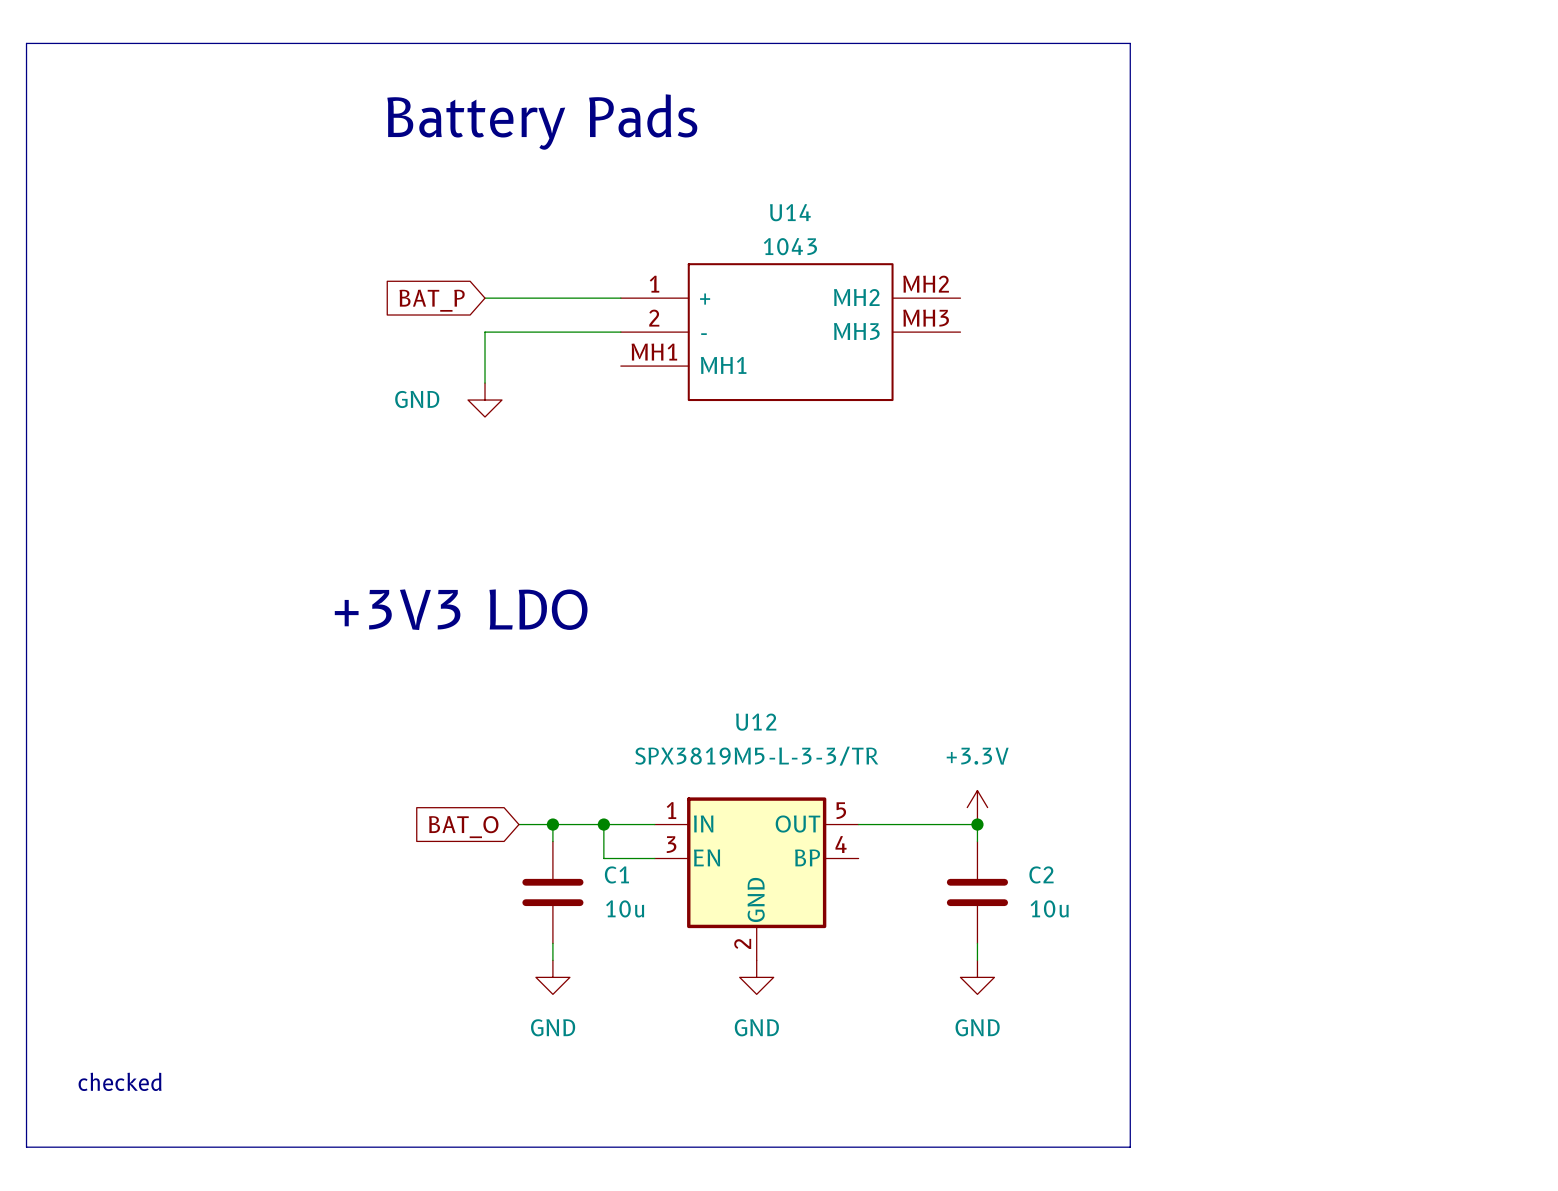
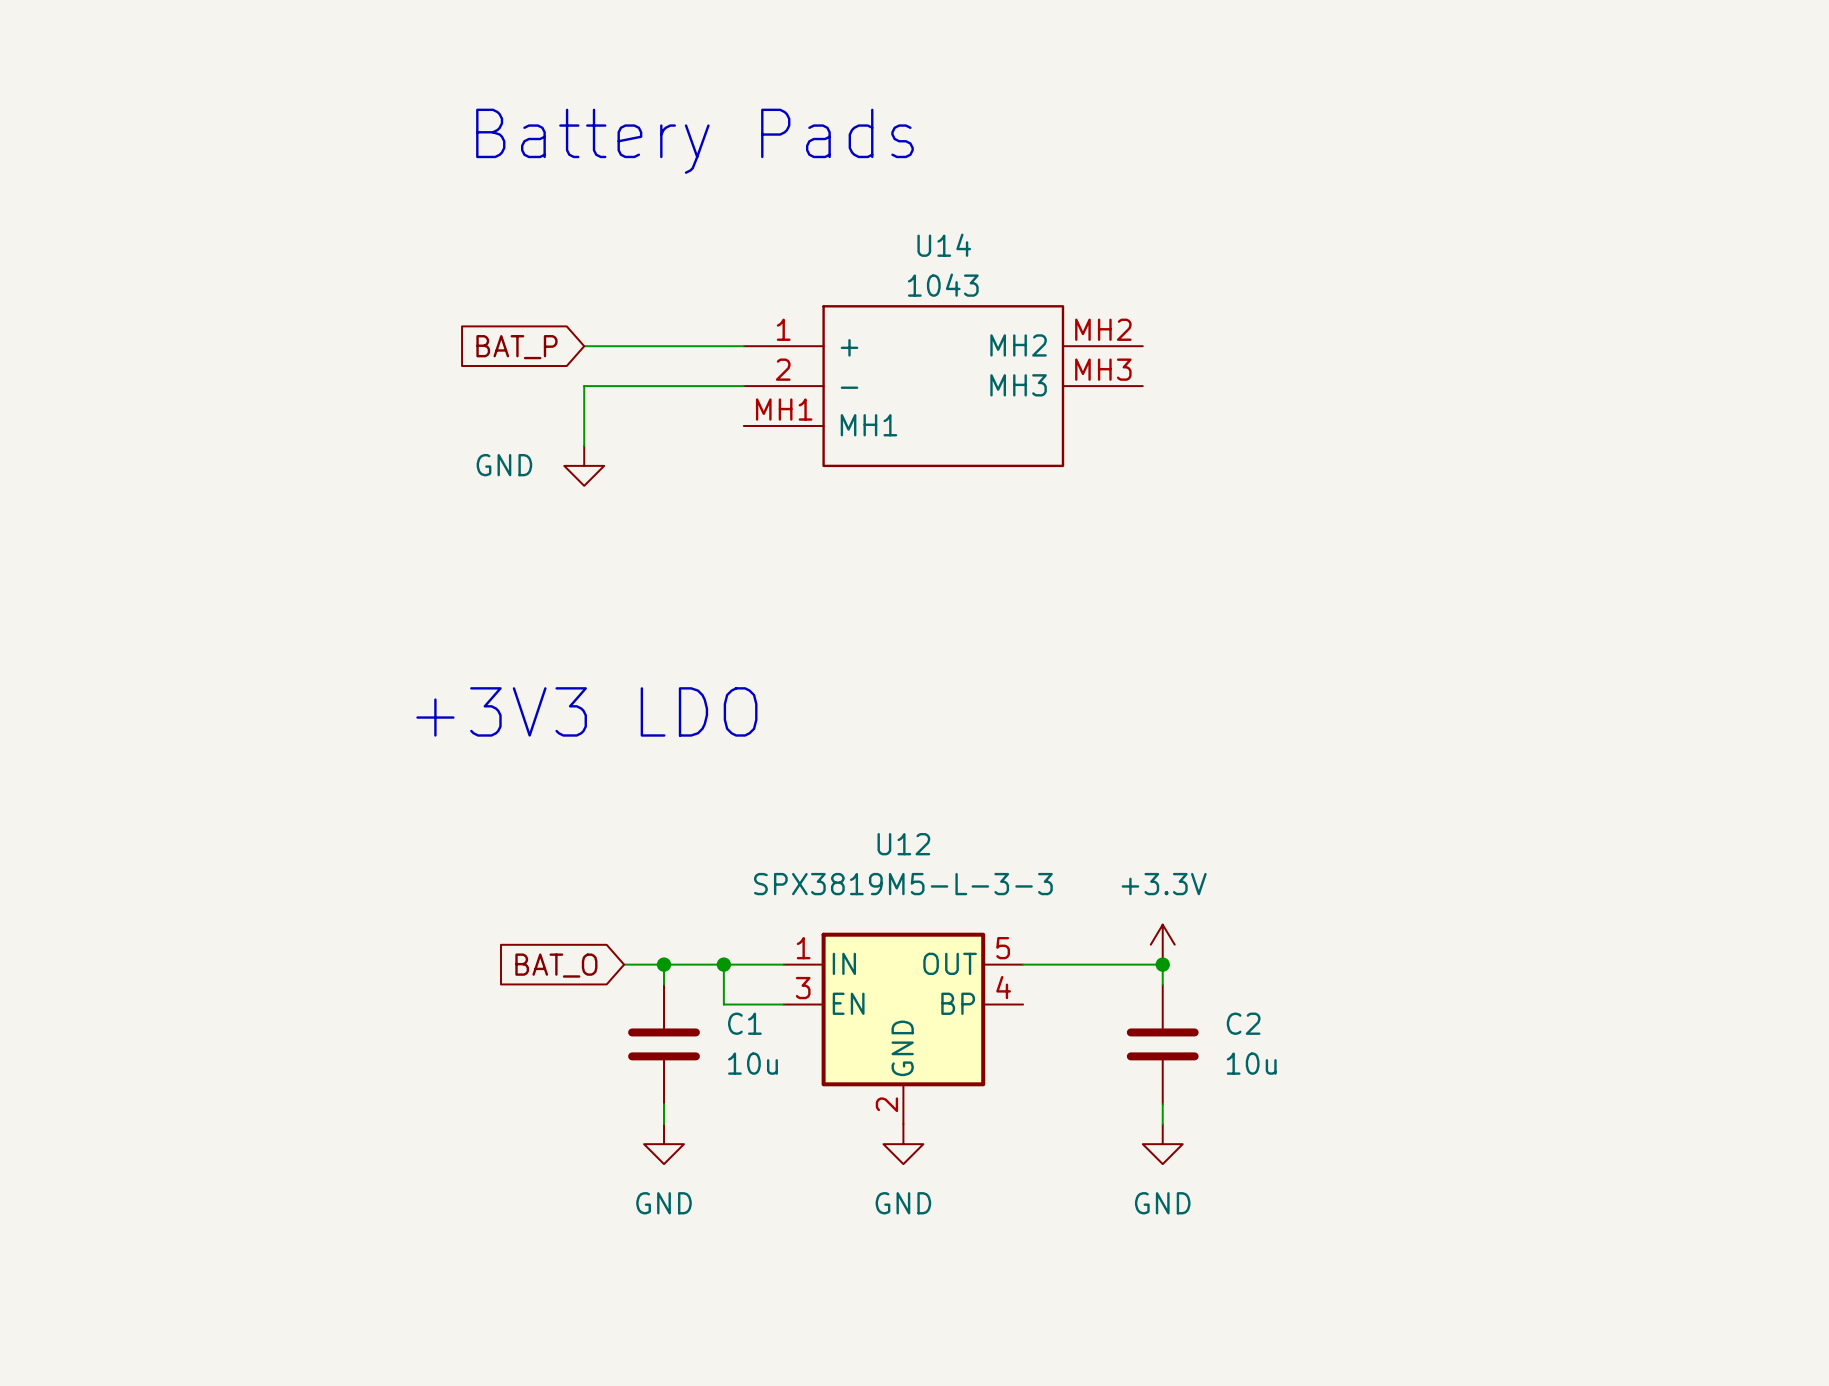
line: (26, 43) (1130, 43) (1130, 1147) (26, 1147) (26, 43) -> none
U12 value: SPX3819M5-L-3-3/TR (756, 756) -> SPX3819M5-L-3-3 (903, 884)
text: checked (120, 1081) -> none

